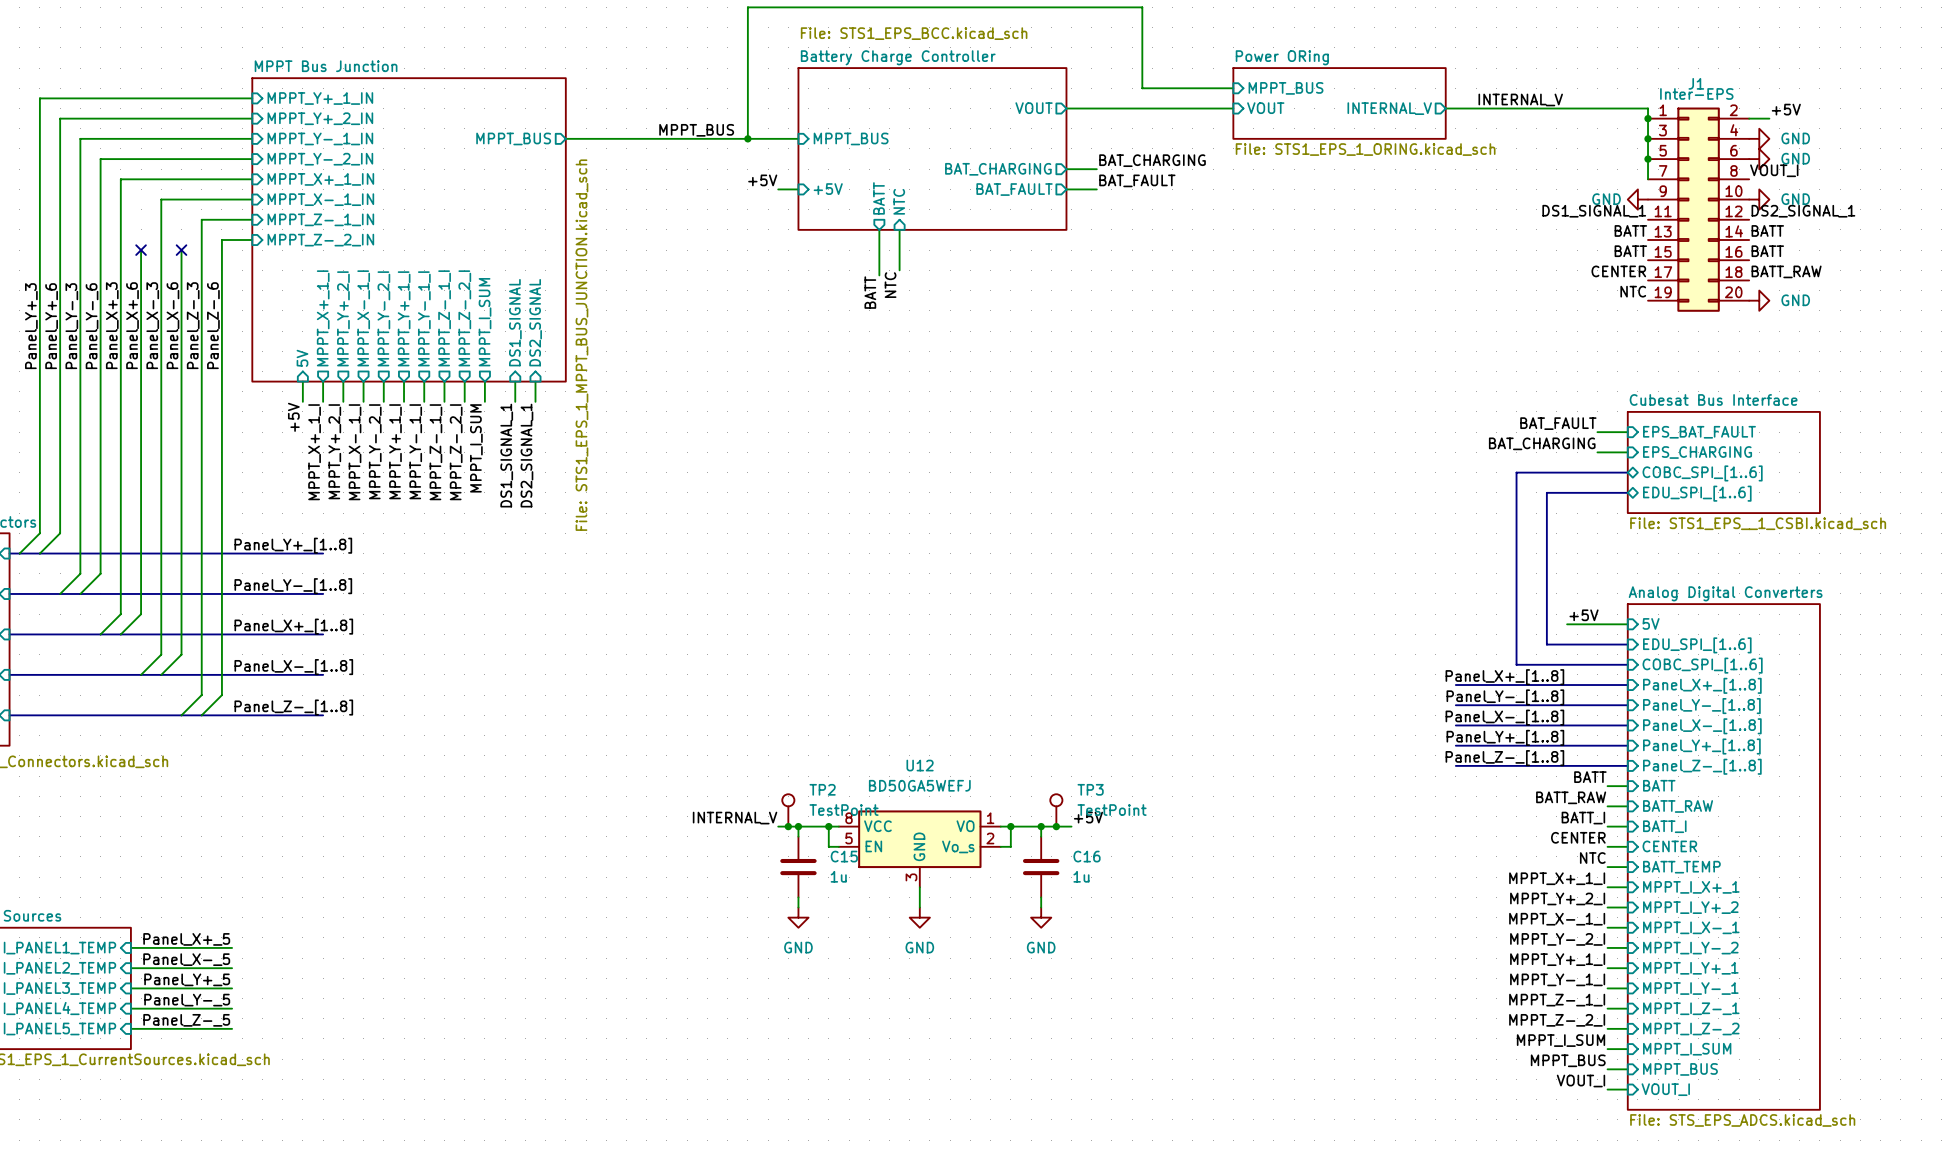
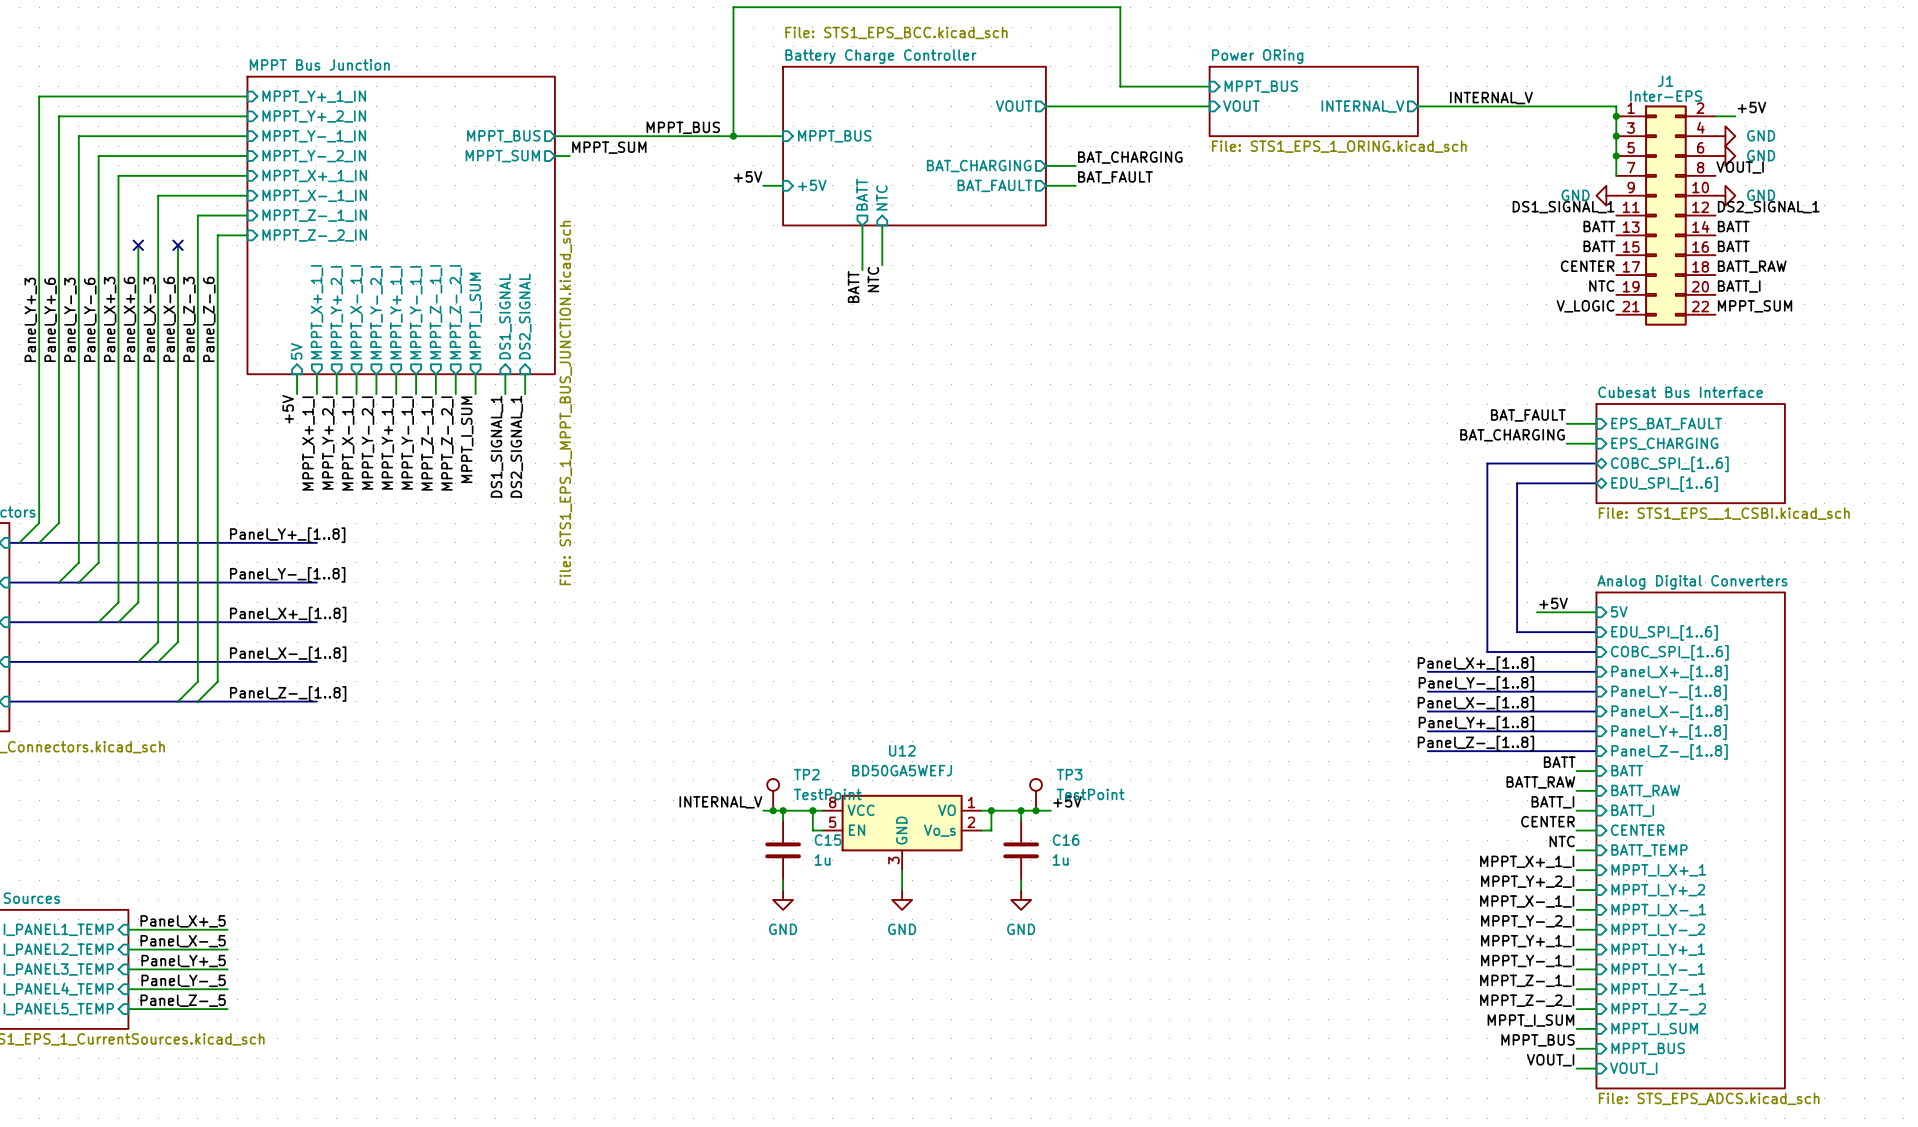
J1 symbol: [1648, 107, 1750, 312] -> [1616, 105, 1716, 326]
label: none -> MPPT_SUM (609, 147)
sheet pin: none -> MPPT_SUM (502, 156)
wire: none -> (554, 156) (569, 156)
label: none -> BATT_I (1739, 286)
power symbol: GND (1759, 300) -> none
label: none -> V_LOGIC (1585, 306)
label: none -> MPPT_SUM (1755, 306)
sheet MPPT Bus Junction value position: File: STS1_EPS_1_MPPT_BUS_JUNCTION.kicad_sch (581, 345) -> File: STS1_EPS_1_MPPT_BUS_JUNCTION.kicad_sch (565, 402)

